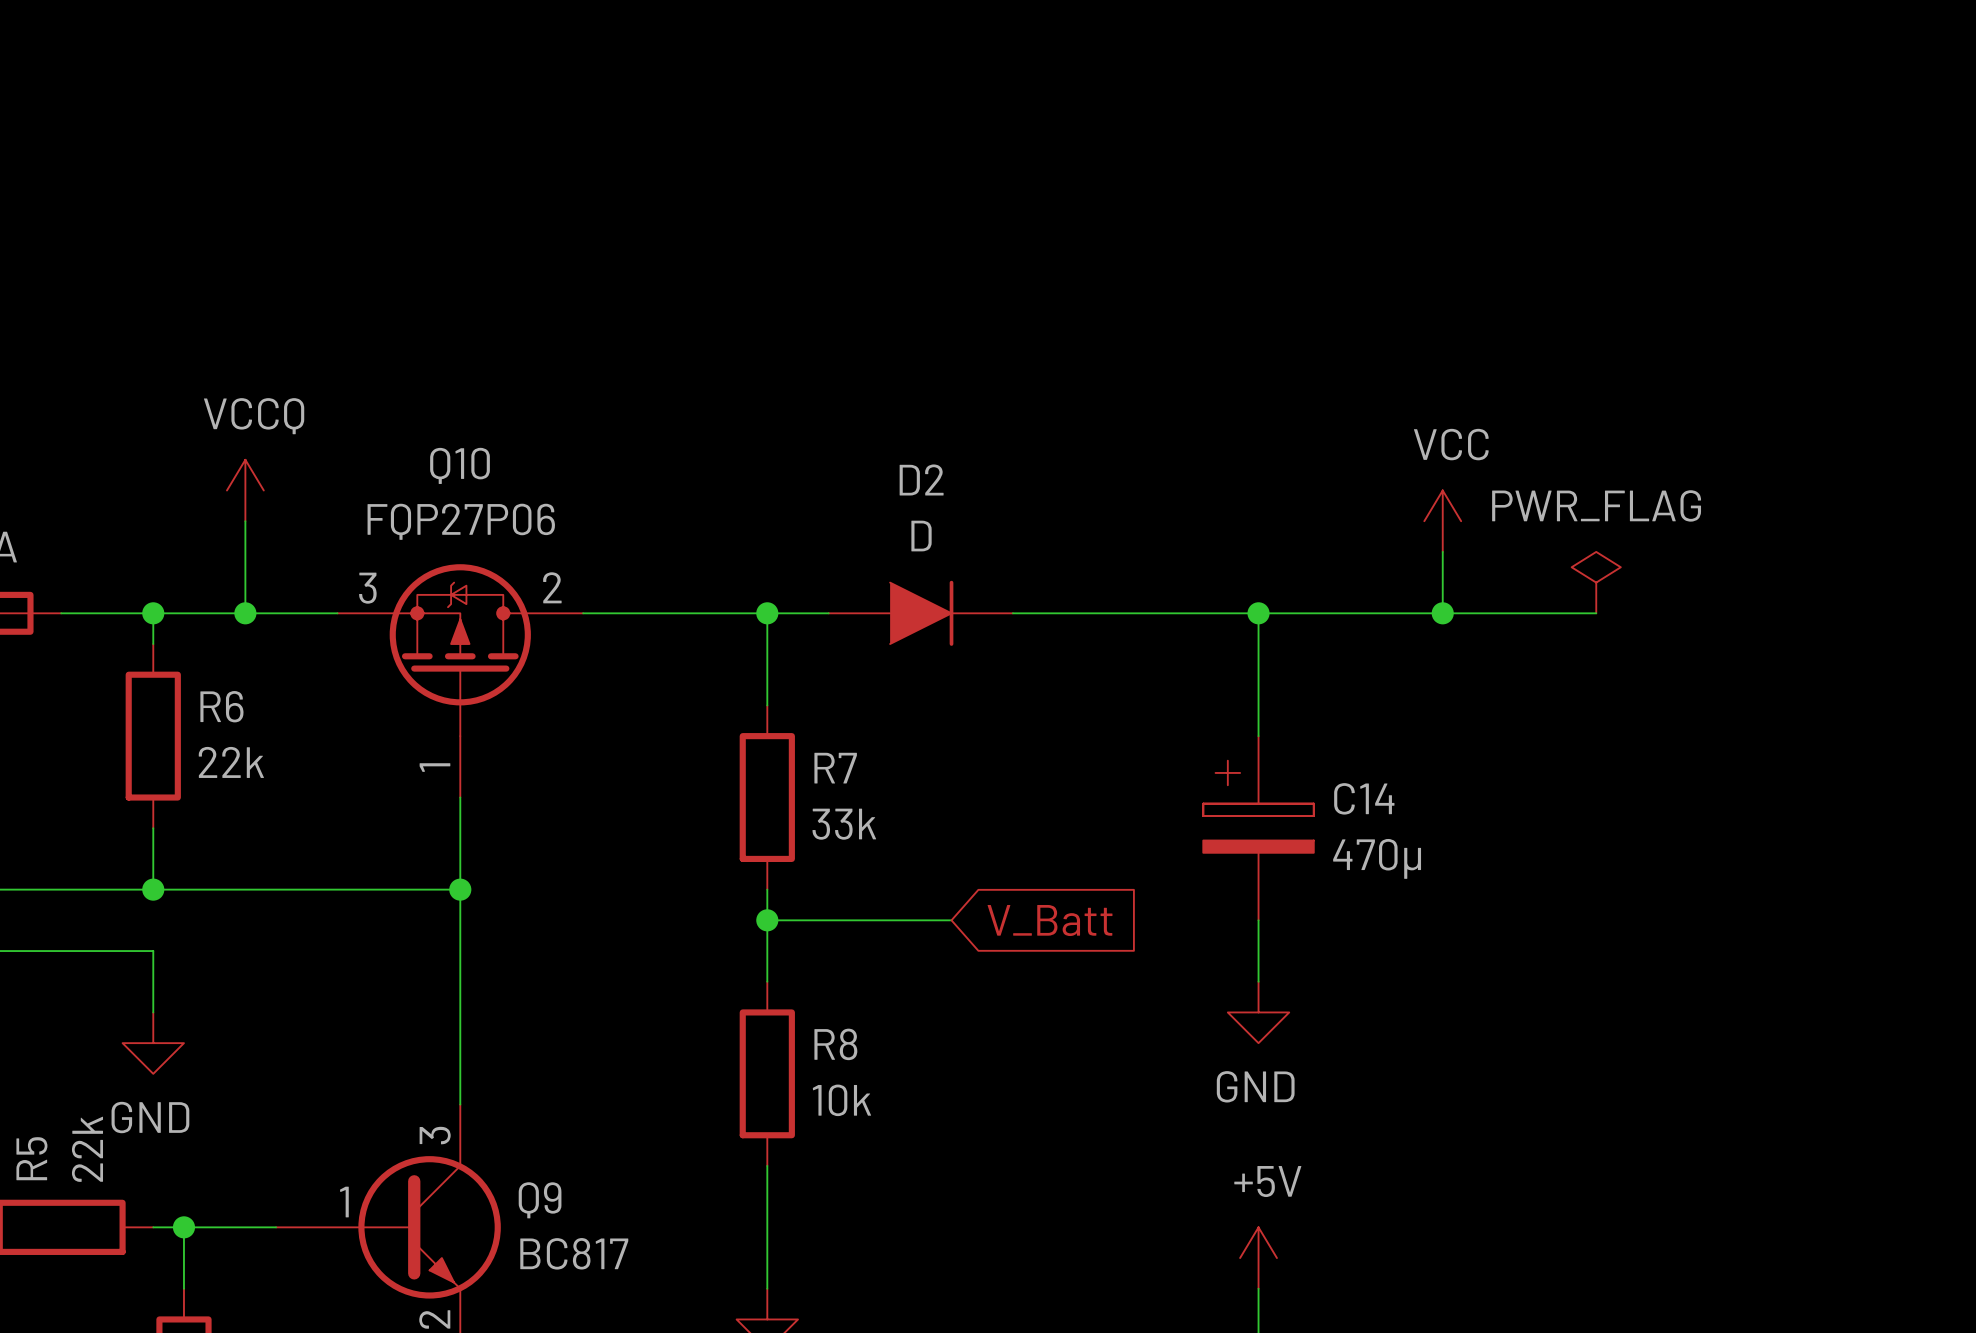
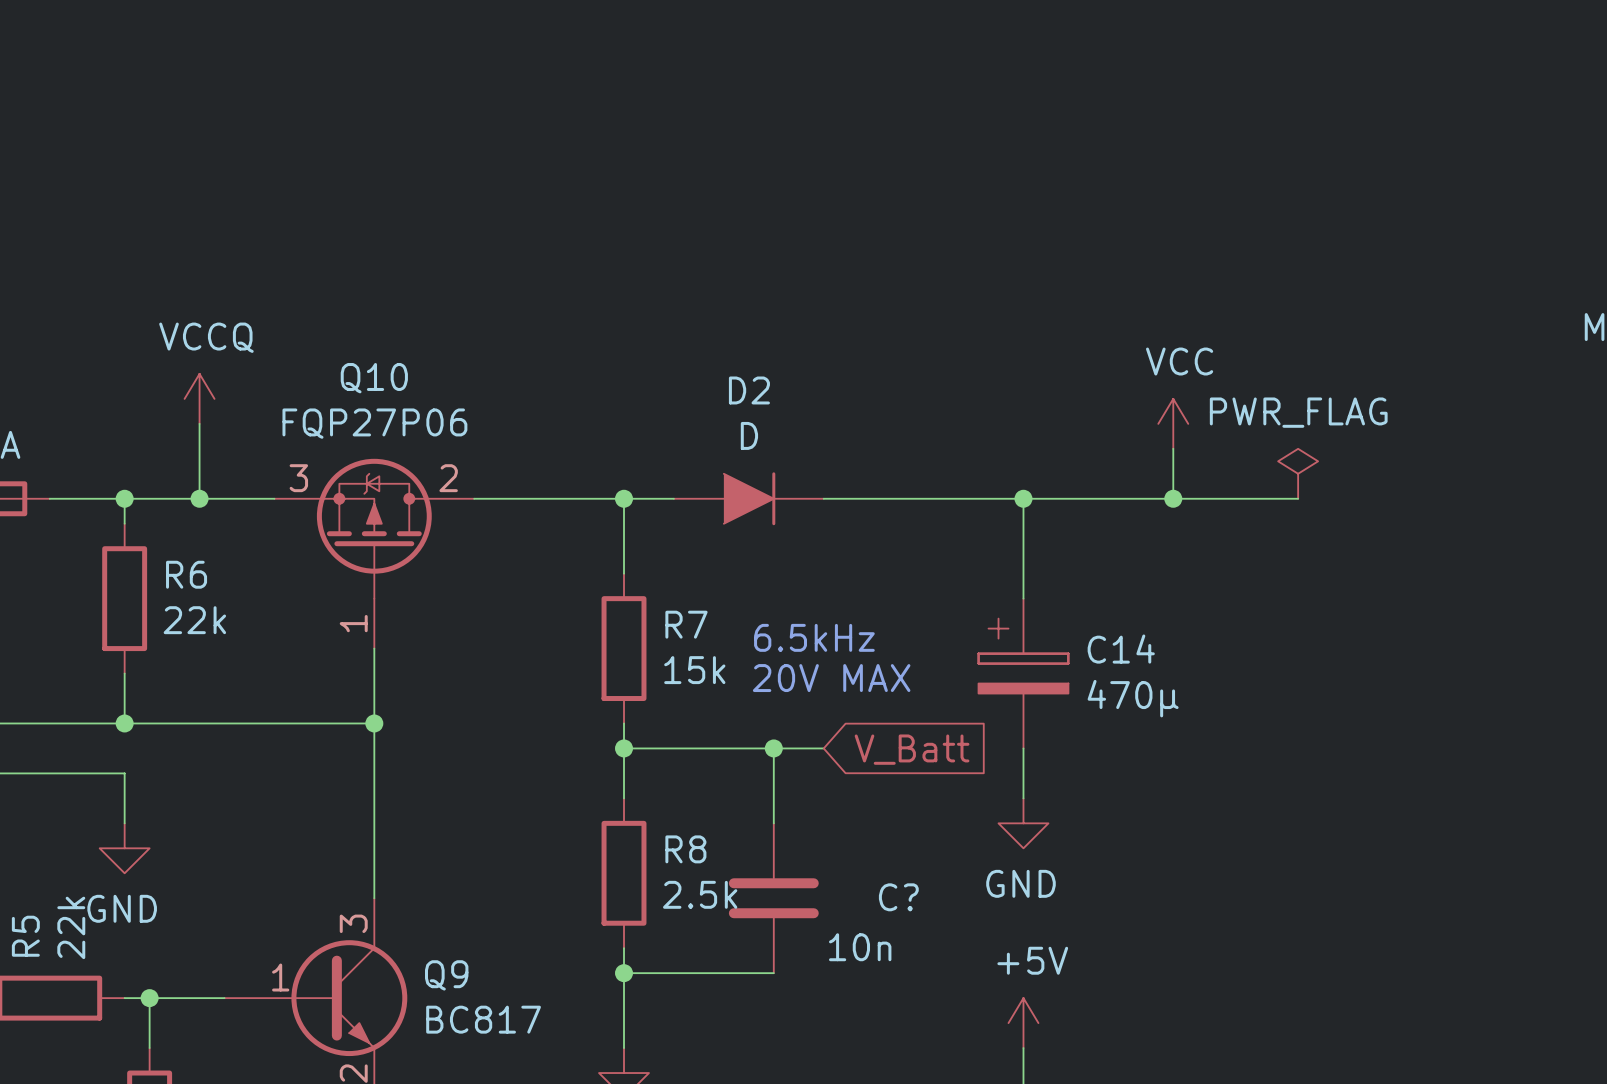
text: none -> 6.5kHz (814, 637)
R7 value: 33k (844, 824) -> 15k (694, 670)
text: none -> 20V MAX (831, 678)
junction: none -> (773, 748)
wire: none -> (823, 748) (773, 748) (773, 823)
global label position: V_Batt (1050, 920) -> V_Batt (912, 749)
R8 value: 10k (841, 1100) -> 2.5k (700, 894)
C?: none -> 10n (773, 898)
wire: none -> (624, 973) (773, 973)
junction: none -> (624, 973)

